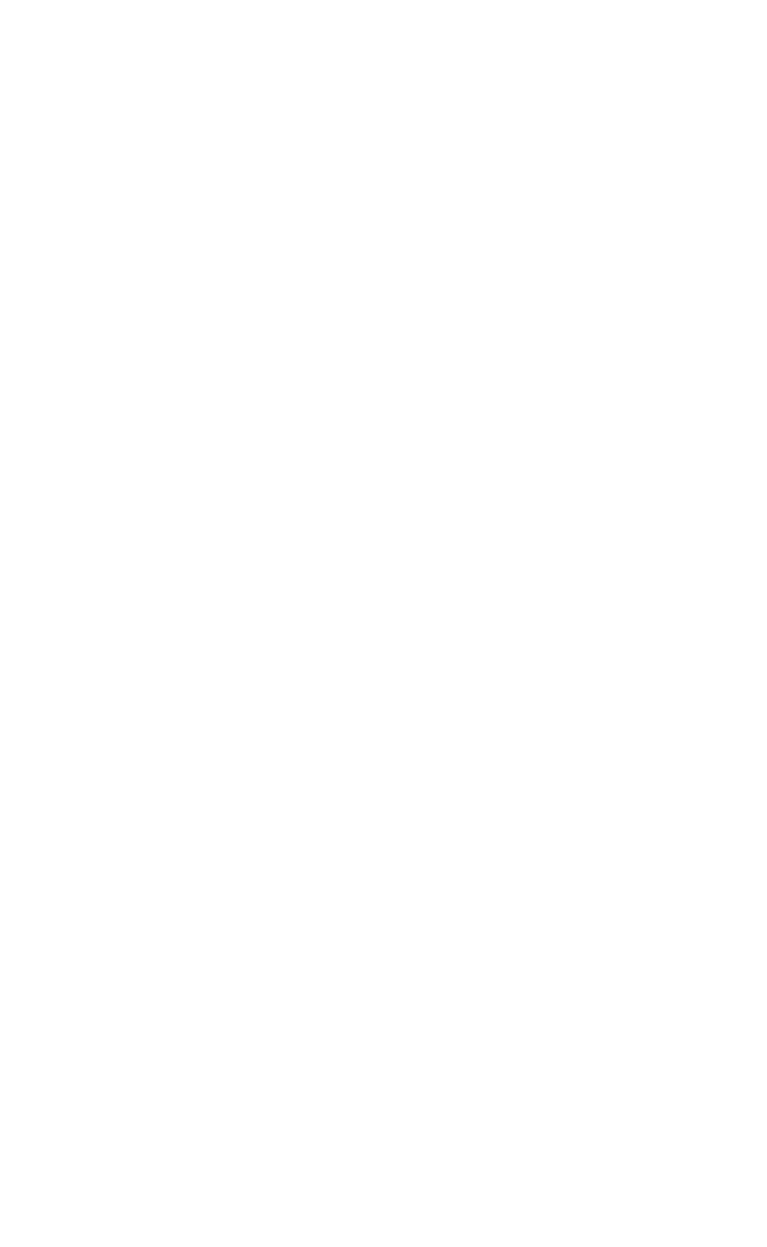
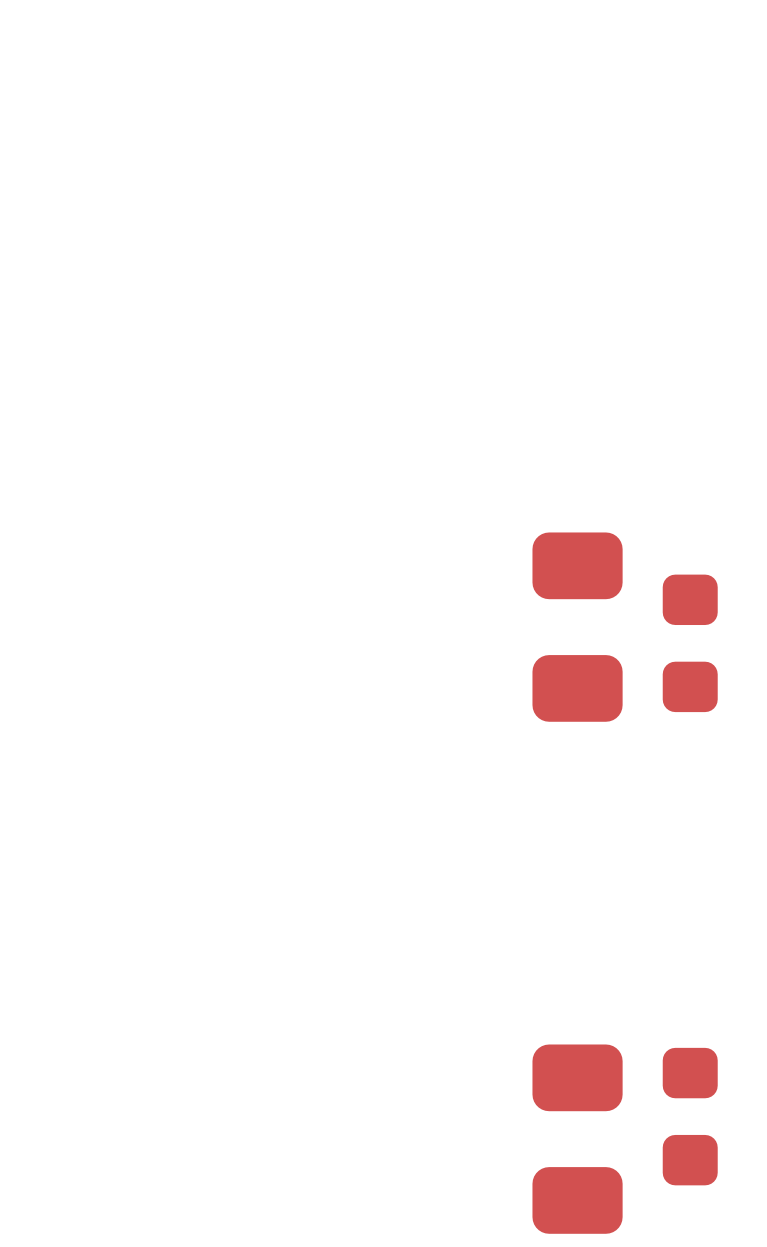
part: none -> (577, 627)
part: none -> (690, 643)
part: none -> (690, 1116)
part: none -> (577, 1139)

